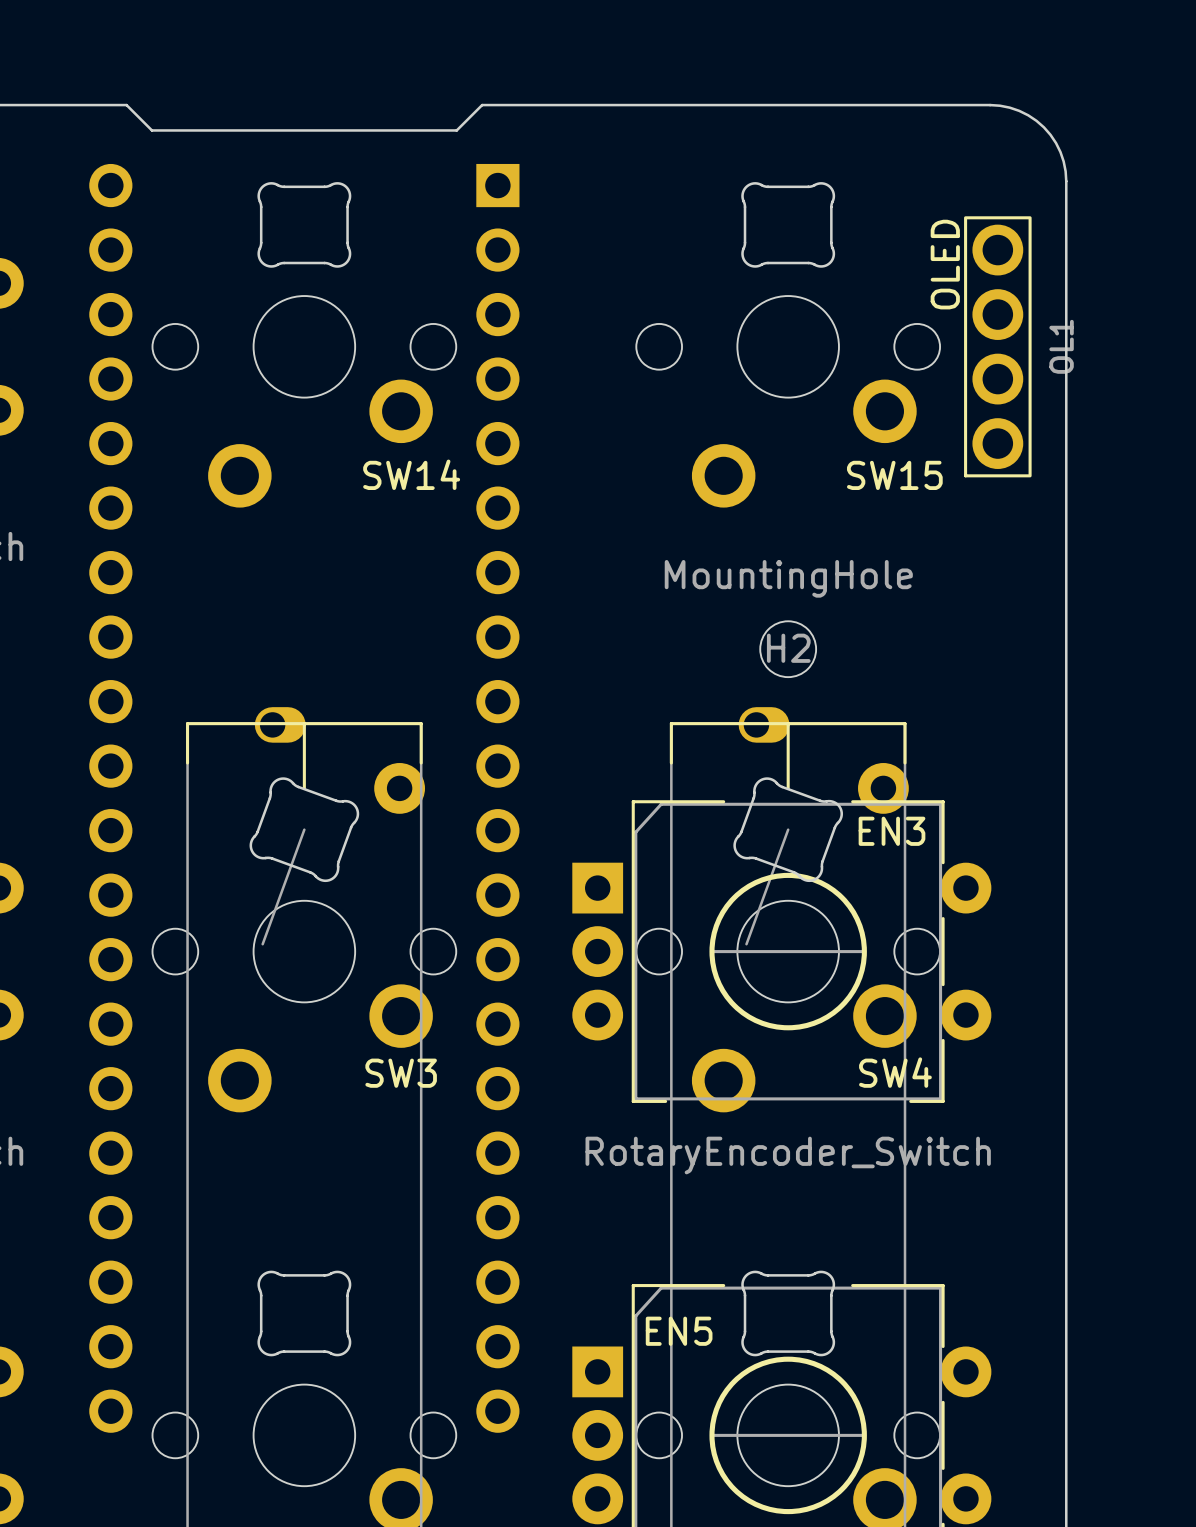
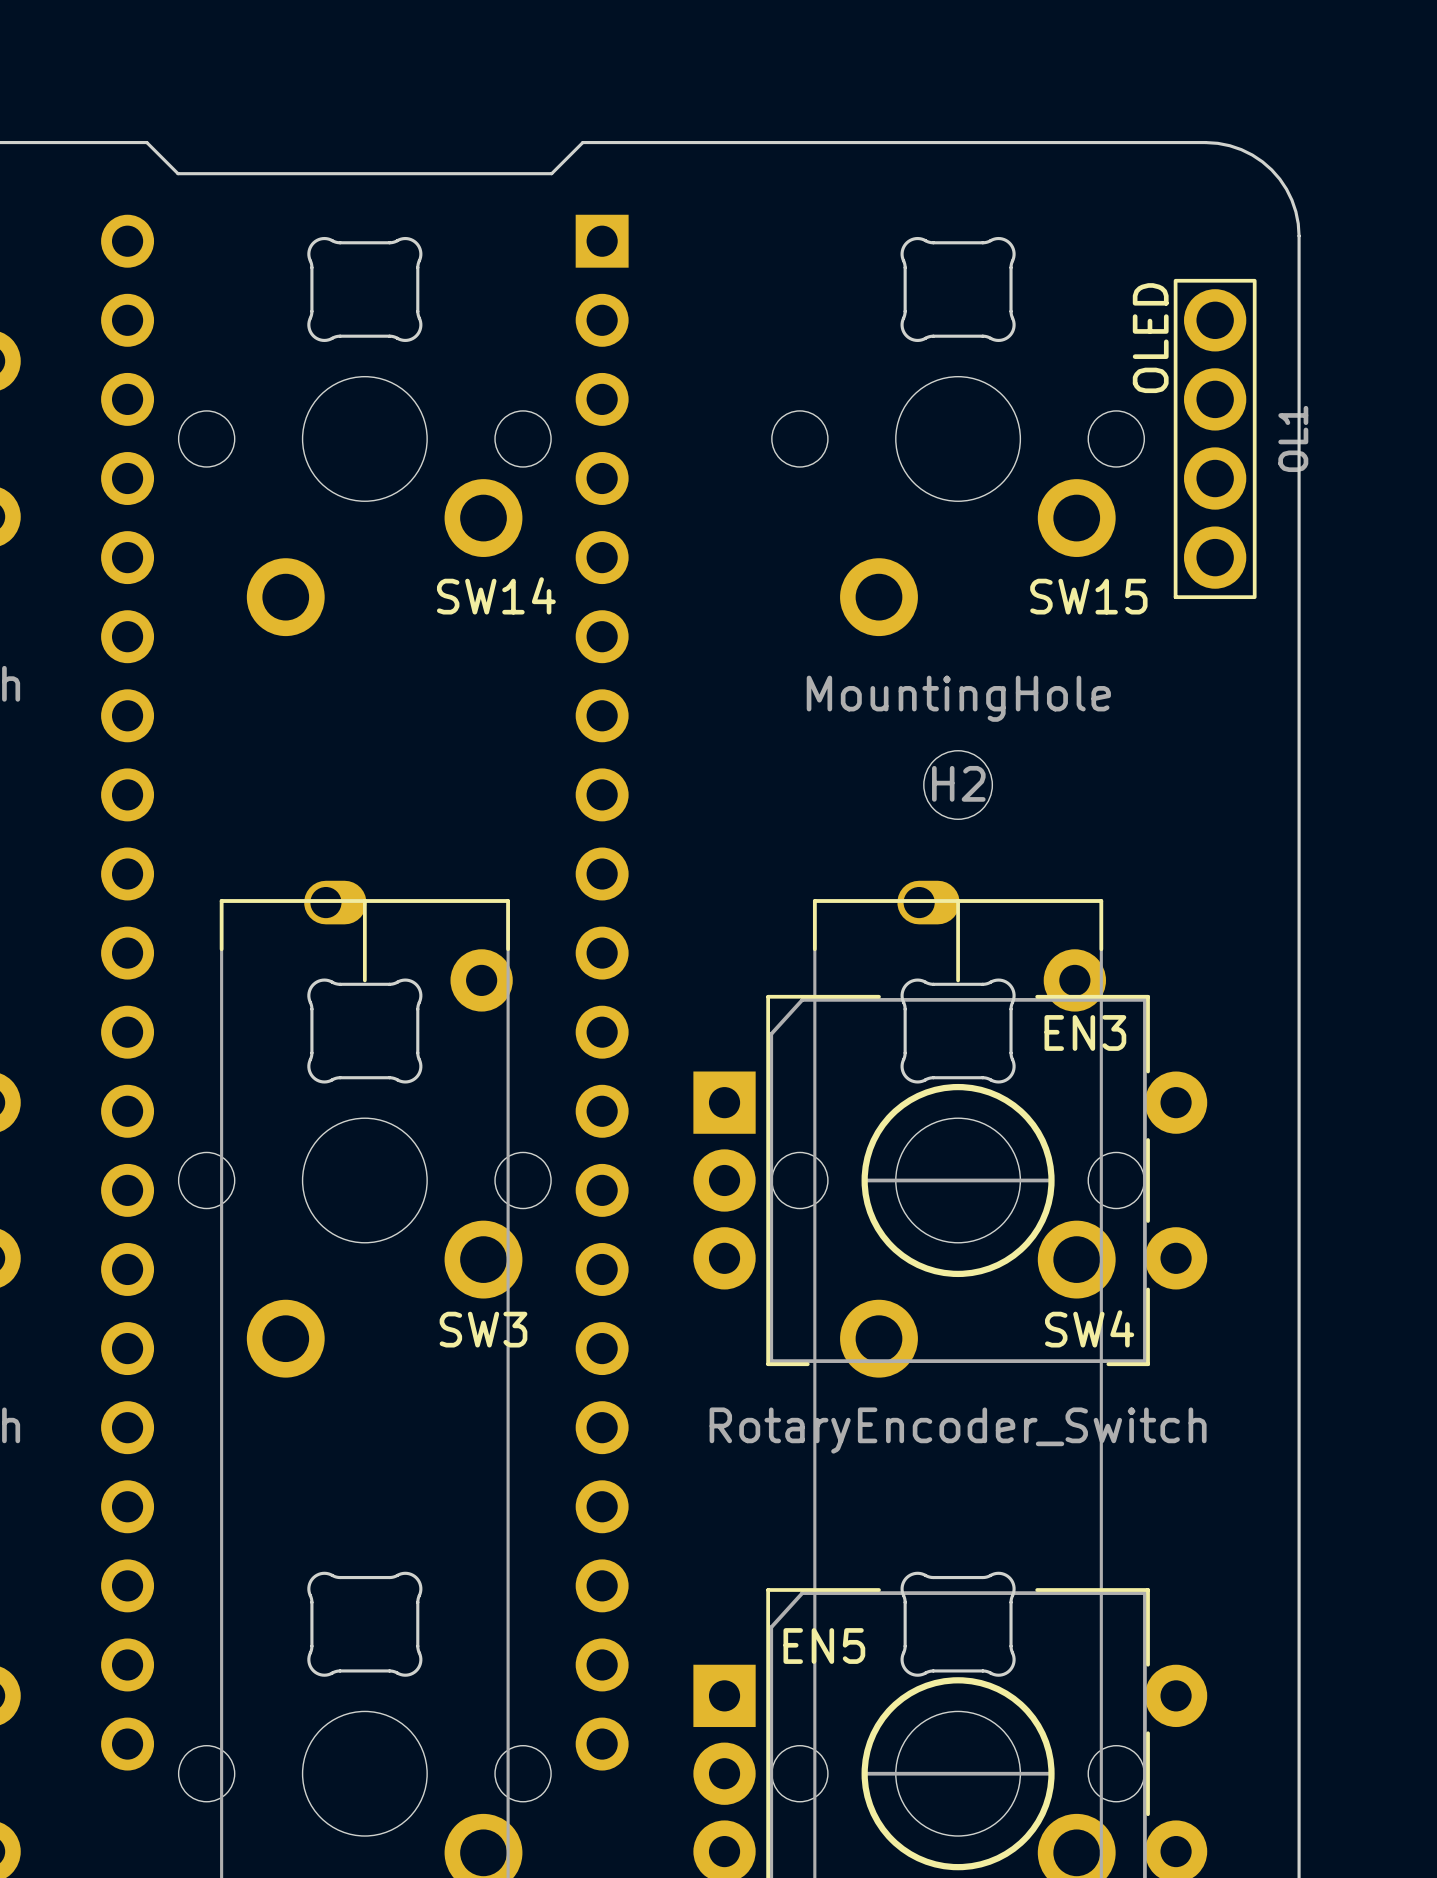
H2 position: (788, 649) -> (958, 785)
part: none -> (364, 1031)
part: none -> (958, 1031)
part: (304, 861) -> none
part: (788, 861) -> none

